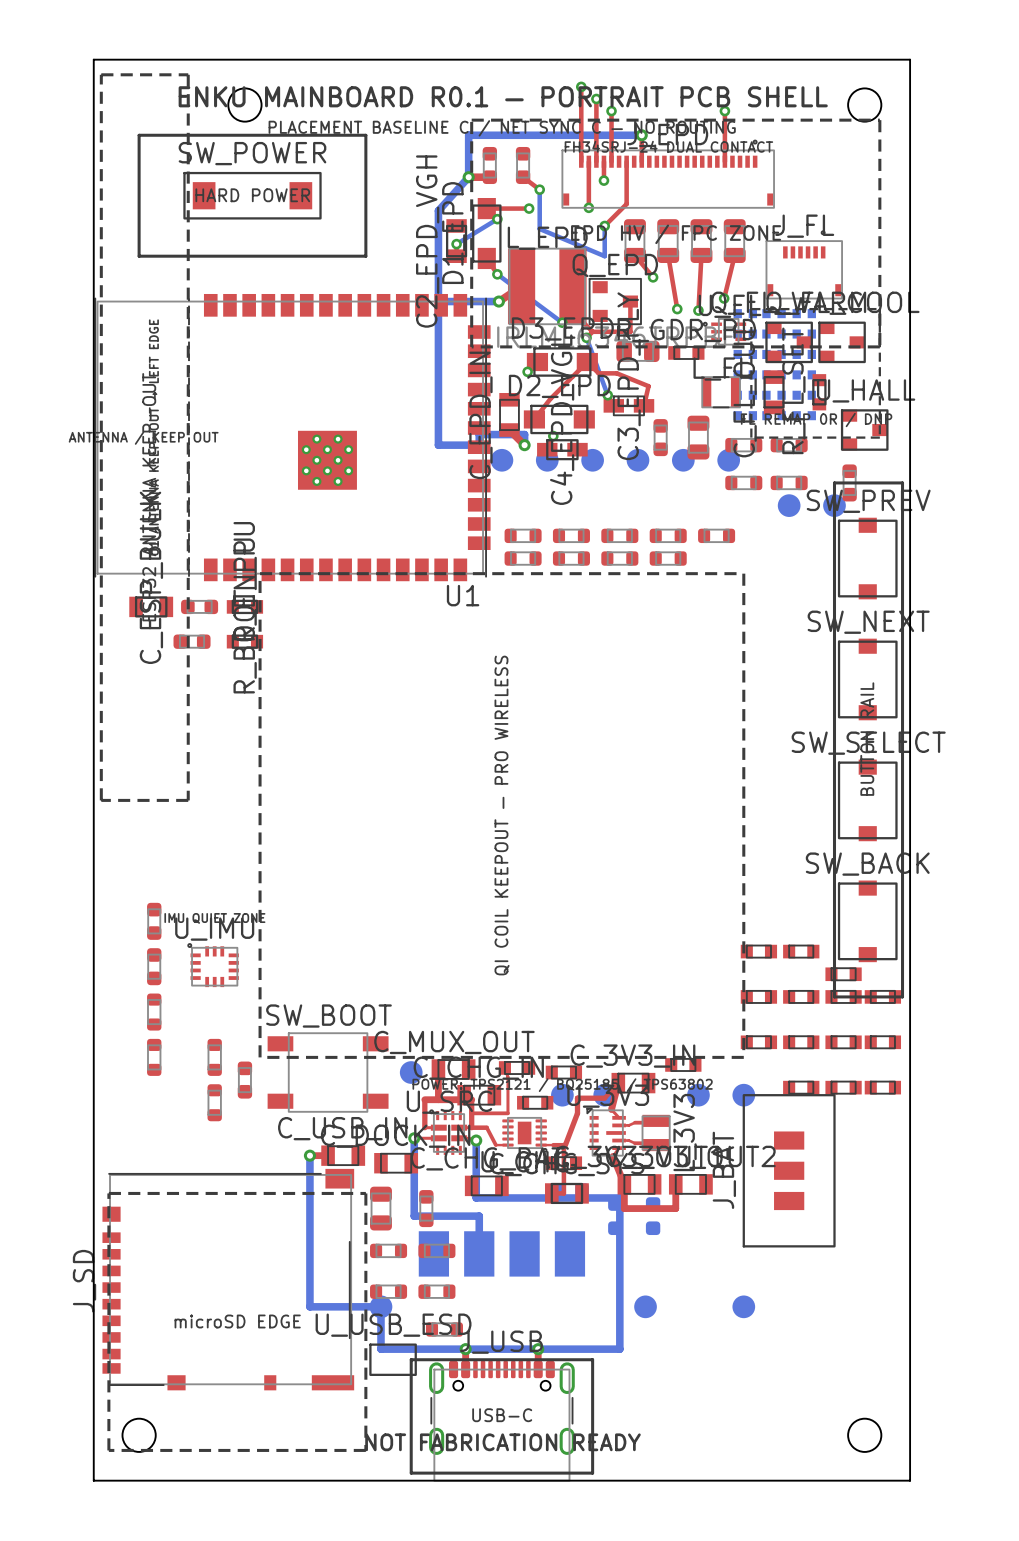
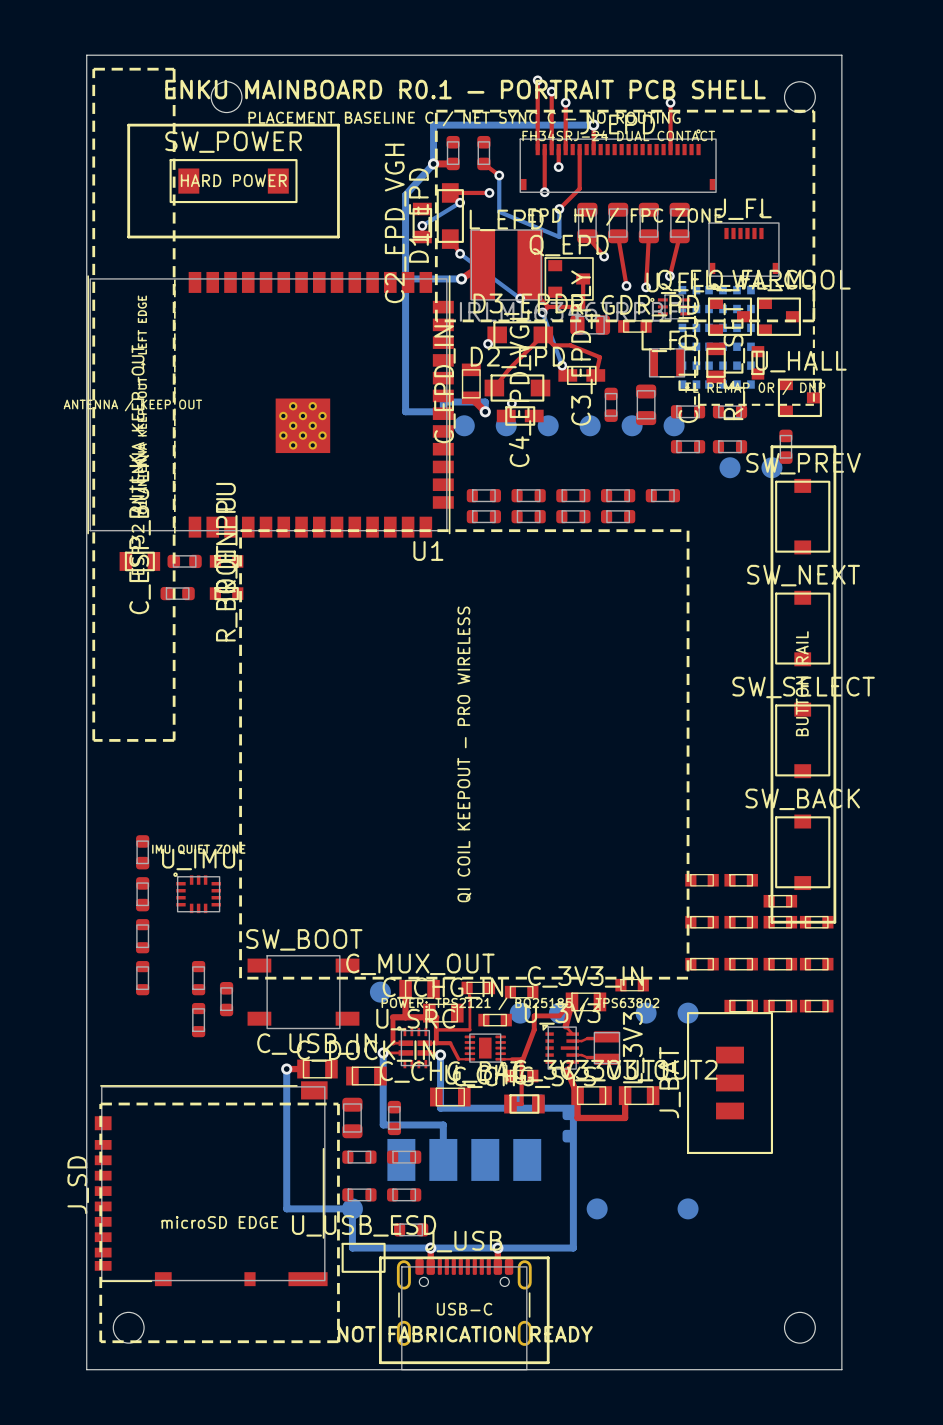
part: (653, 1216) -> none

